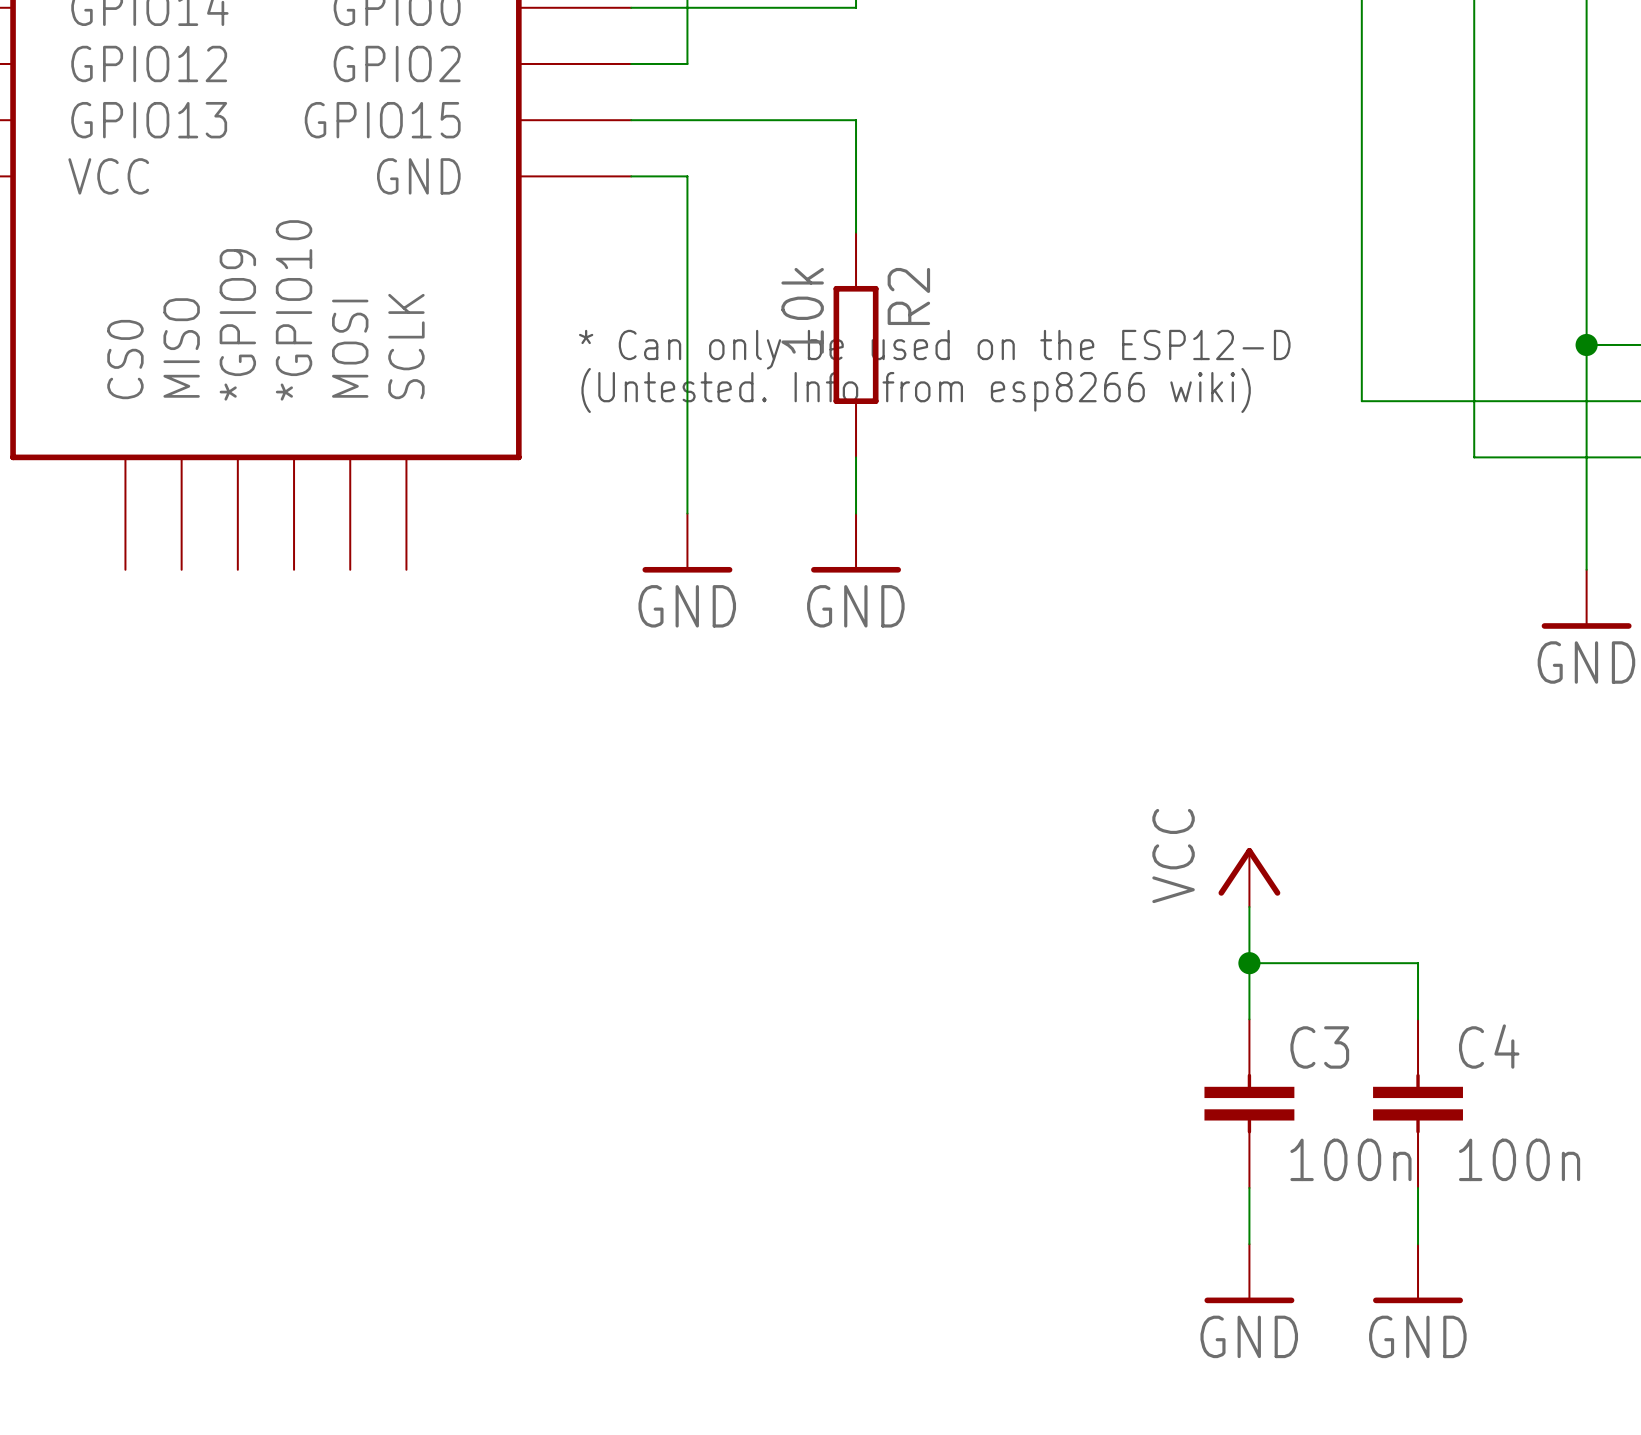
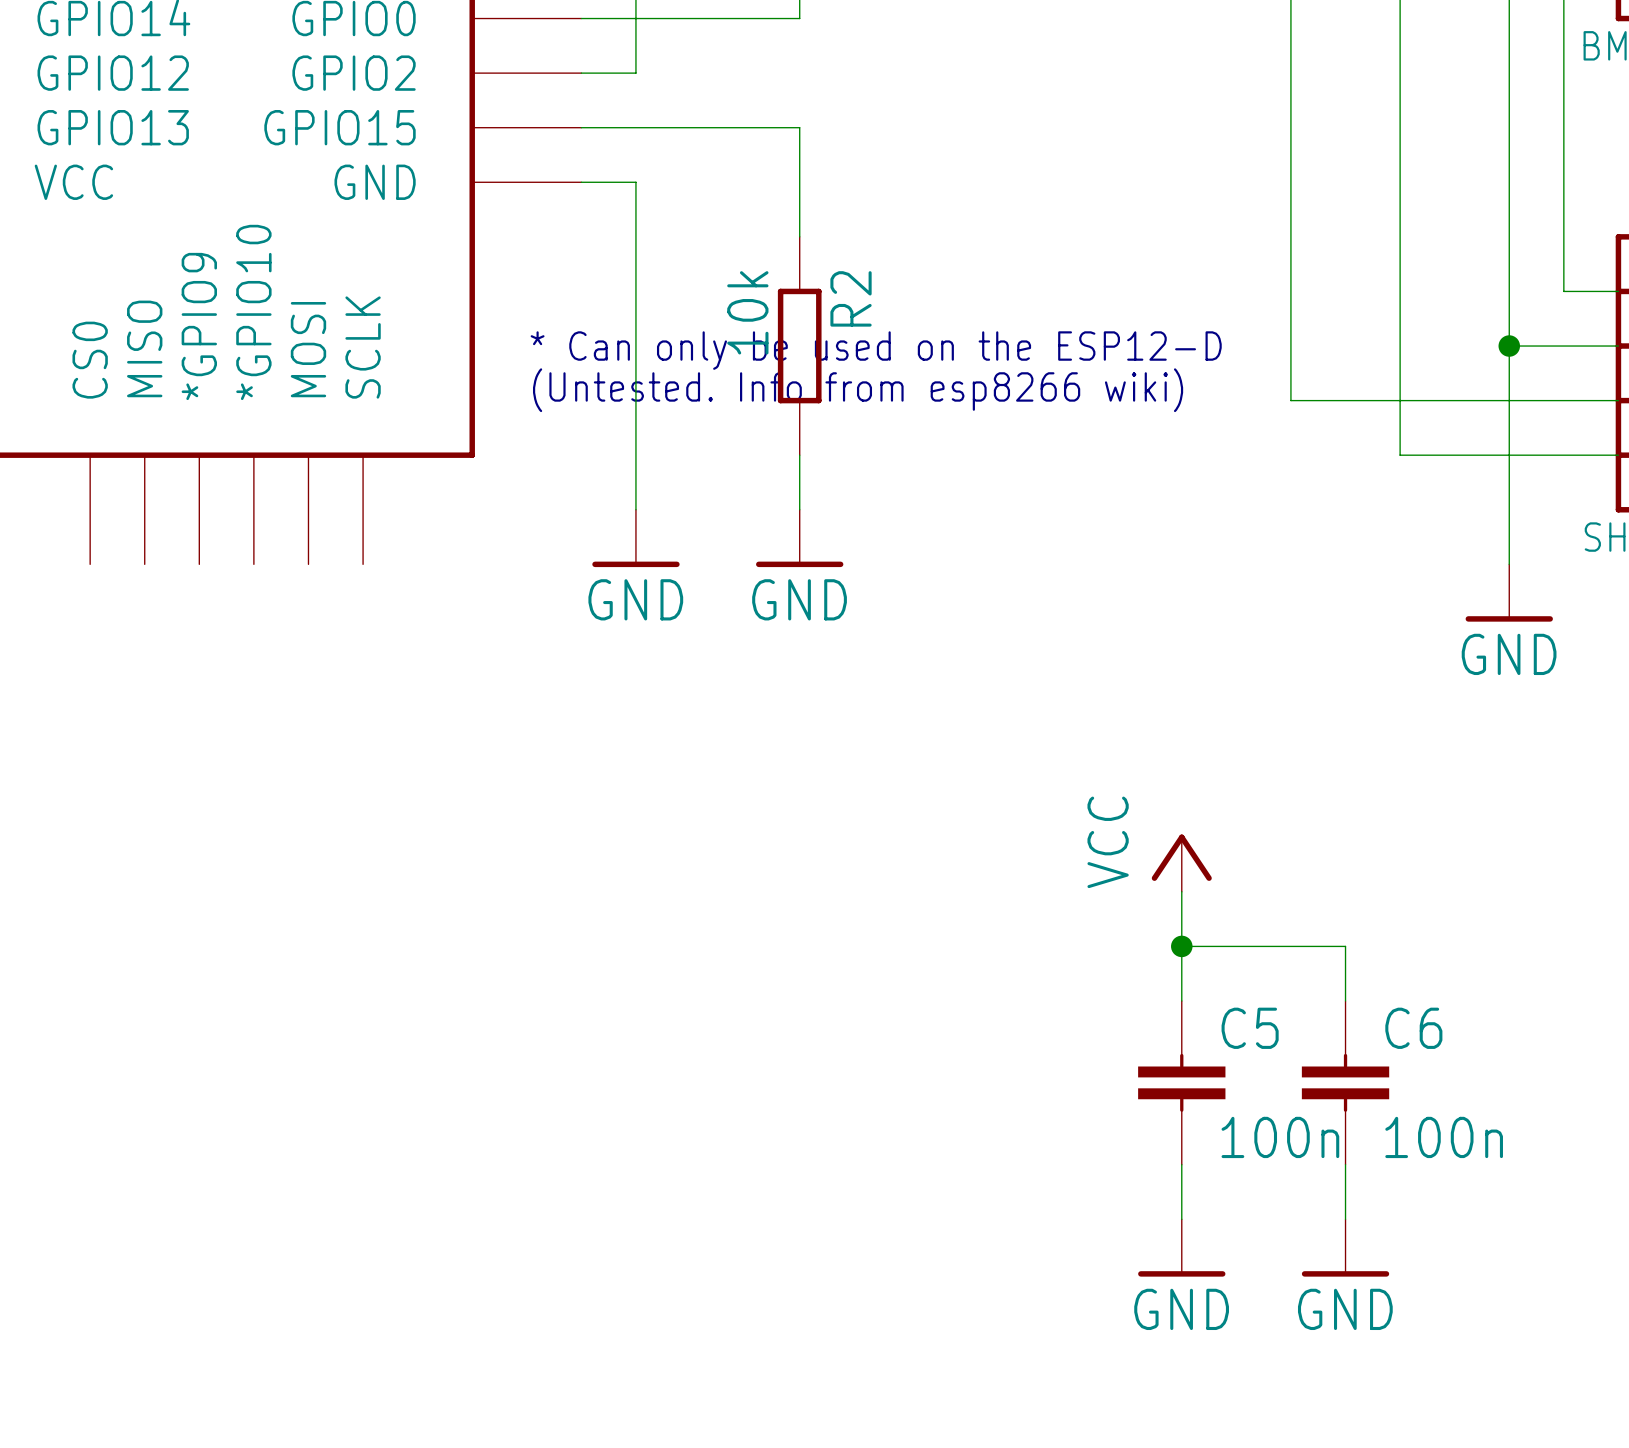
C4 name: C4 (1489, 1046) -> C6 (1413, 1028)
C3 name: C3 (1319, 1047) -> C5 (1250, 1028)

